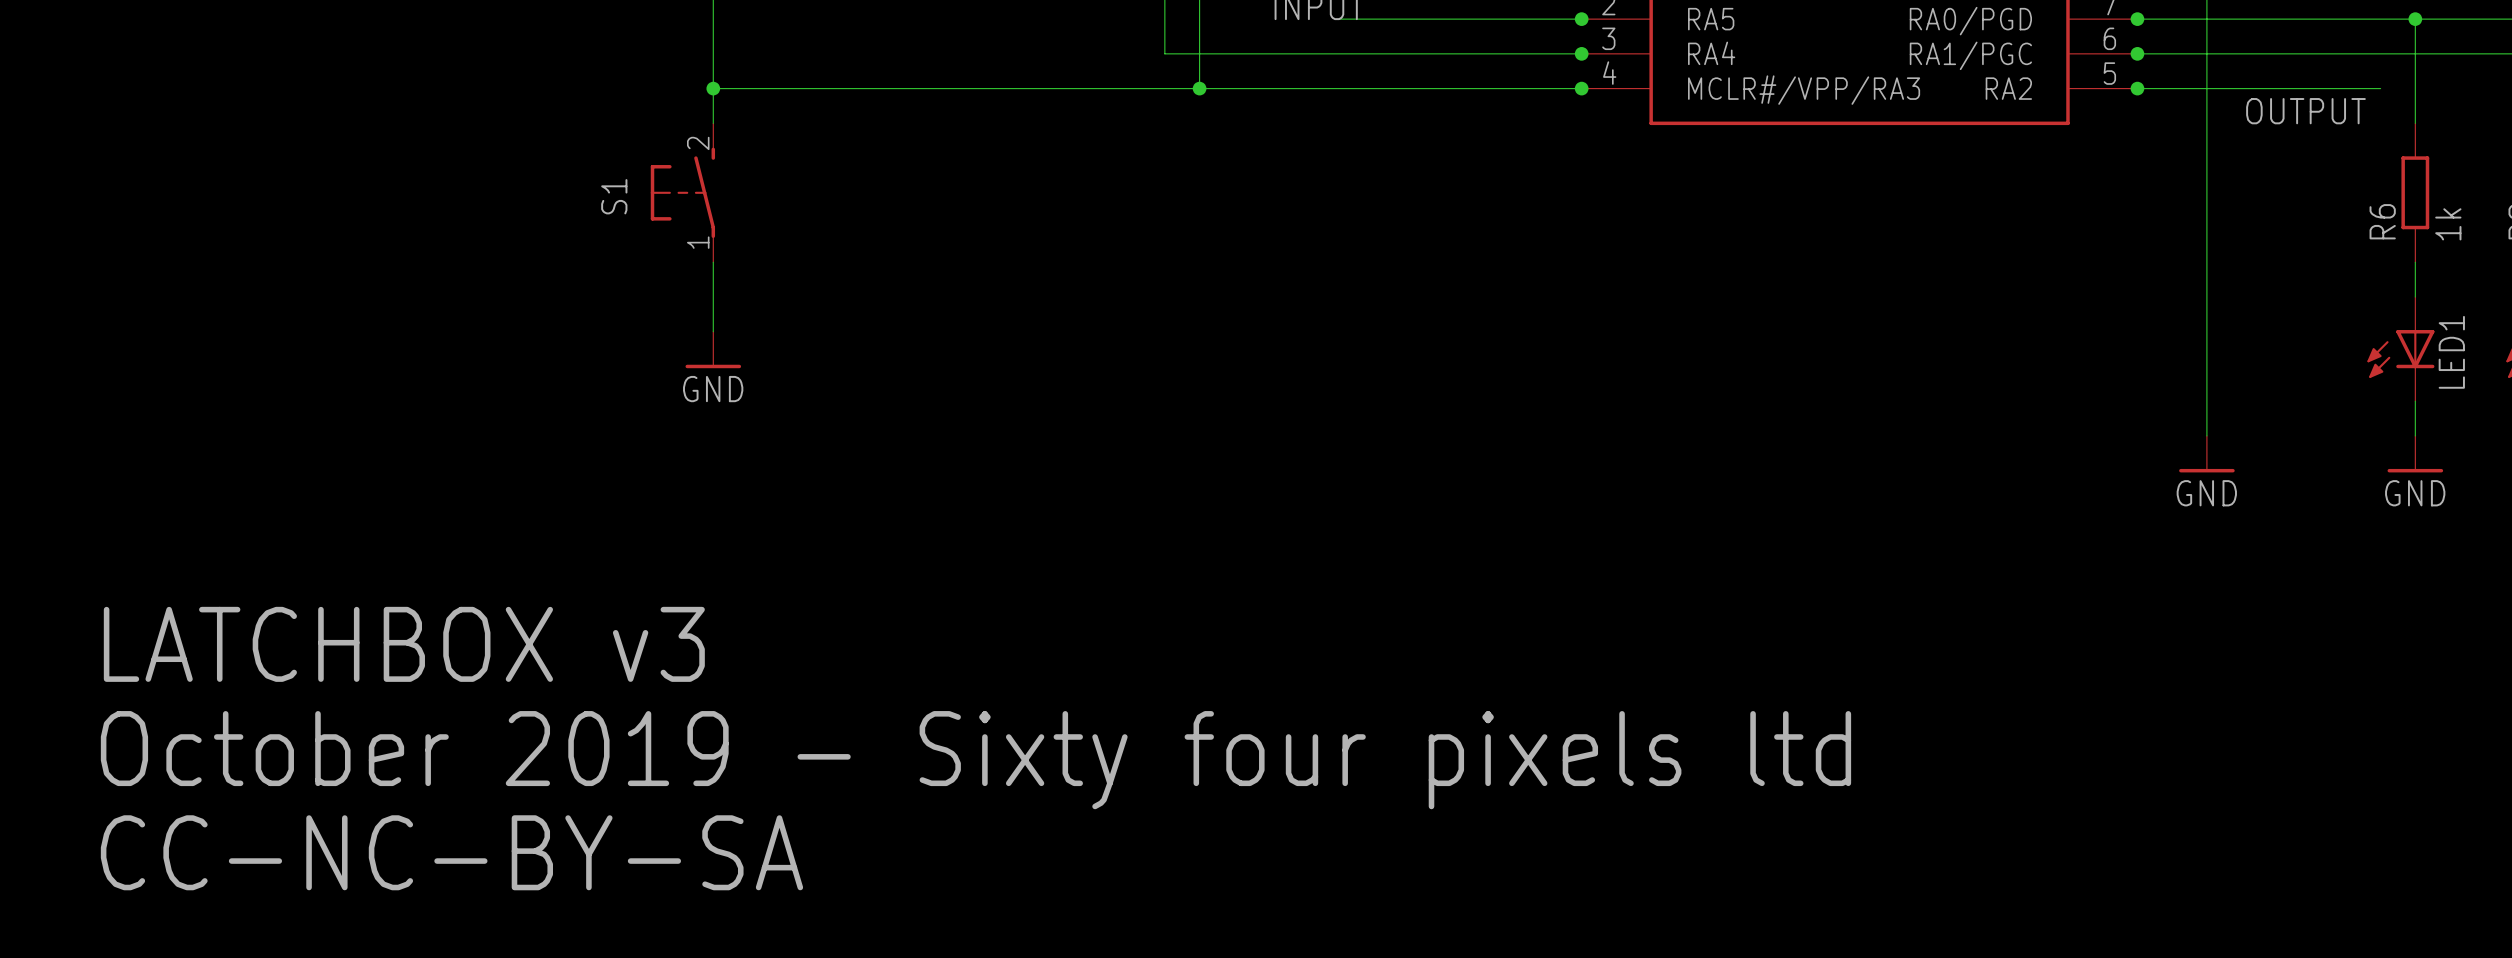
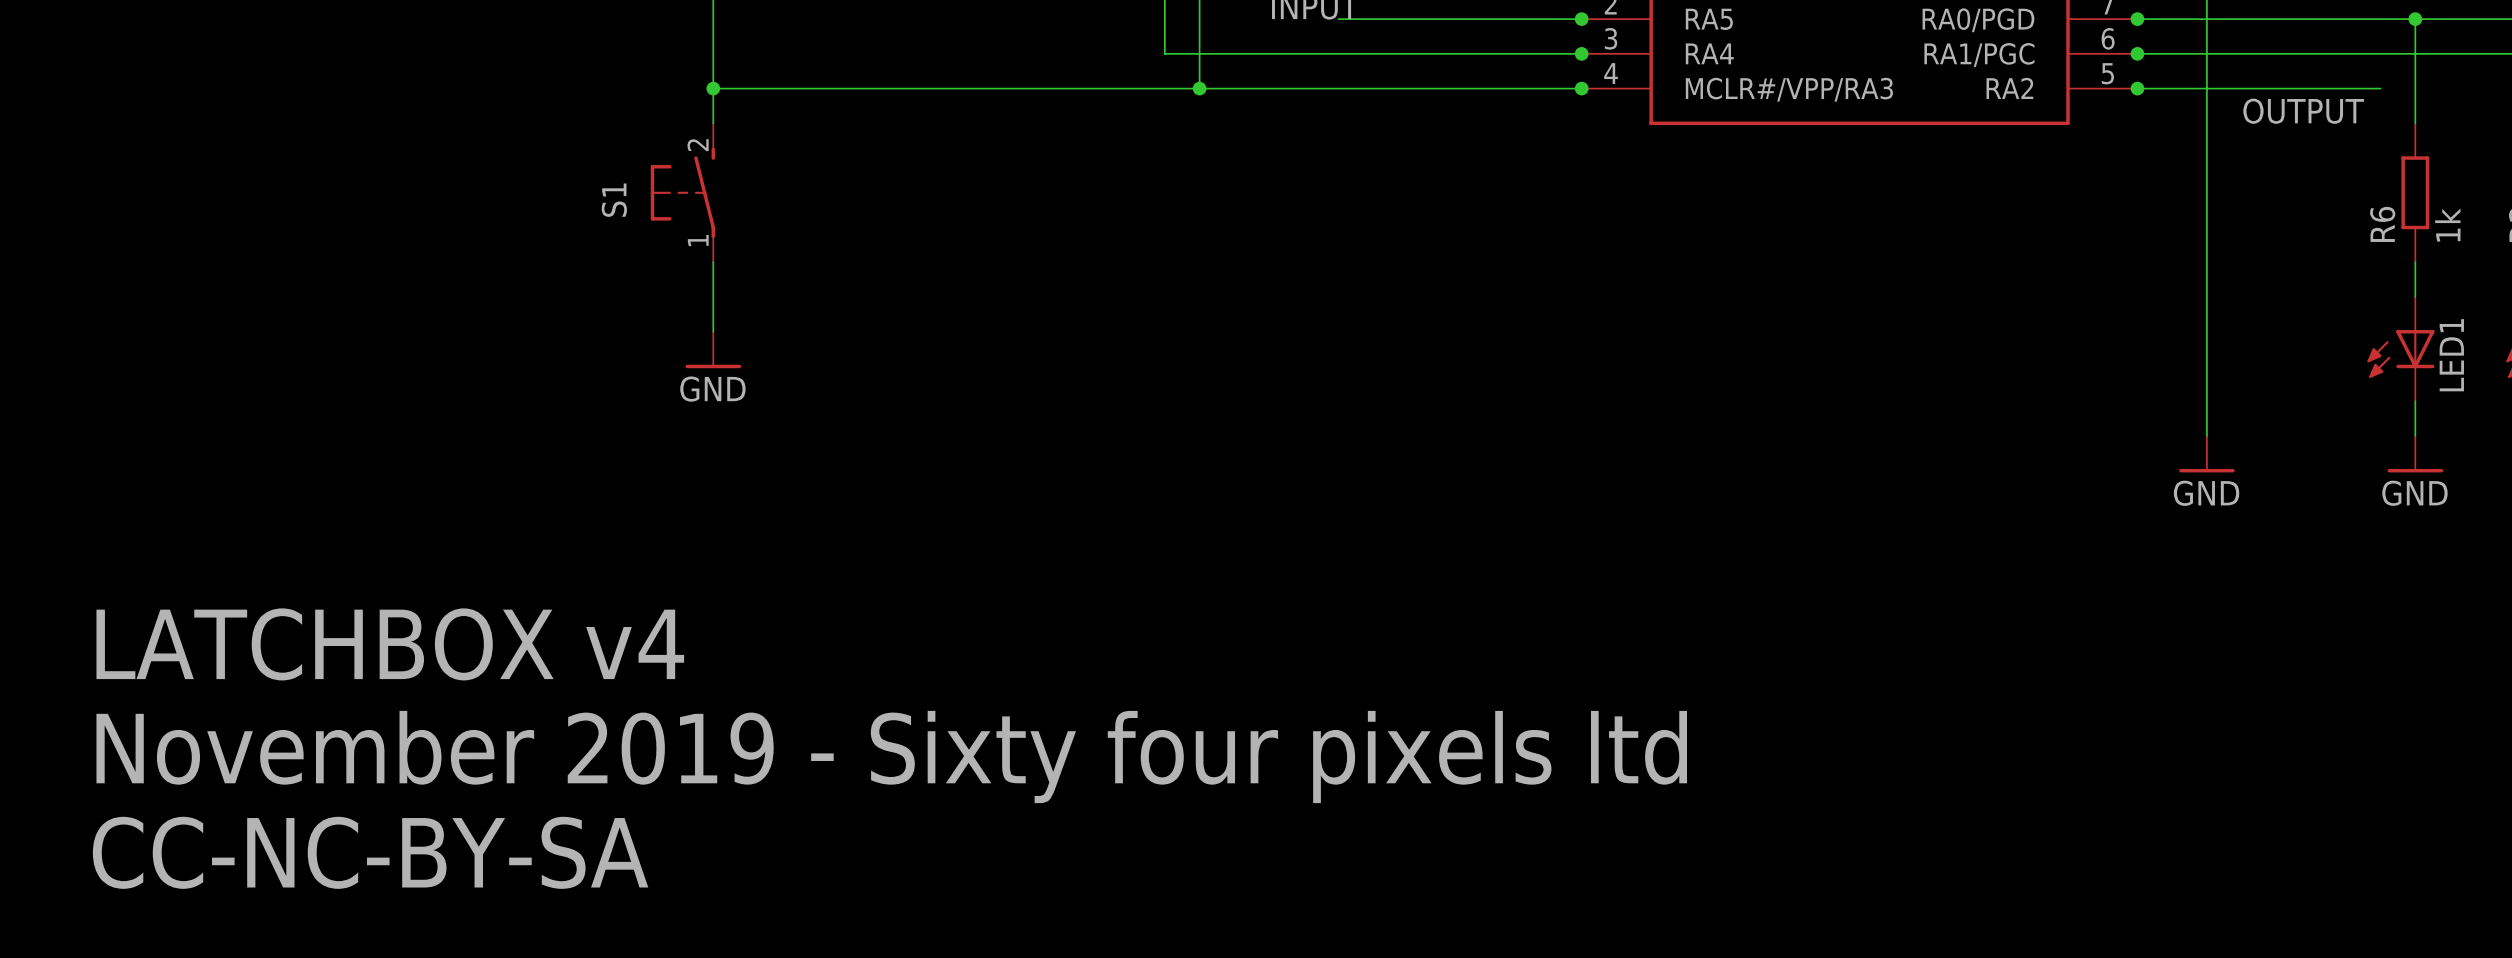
text: LATCHBOX v3 (404, 644) -> LATCHBOX v4 (390, 644)
text: October 2019 - Sixty four pixels ltd (975, 760) -> November 2019 - Sixty four pixels ltd (891, 757)

